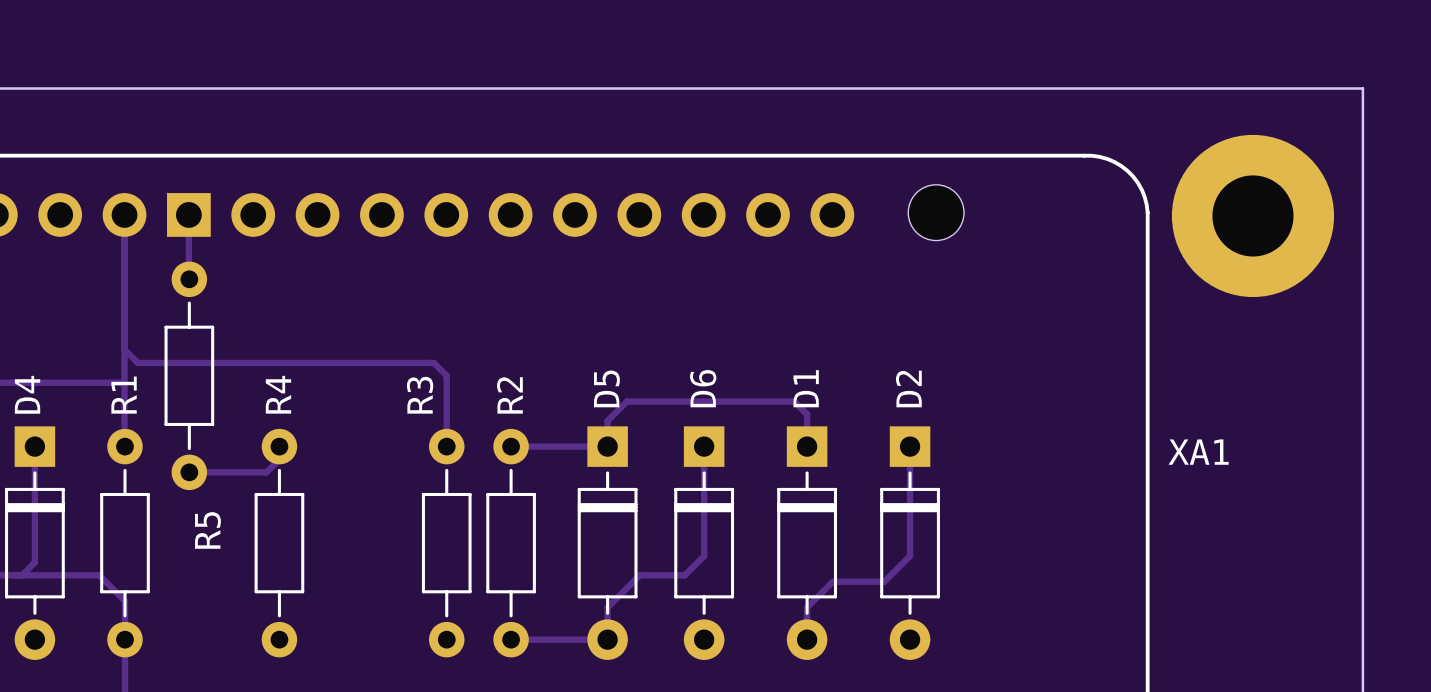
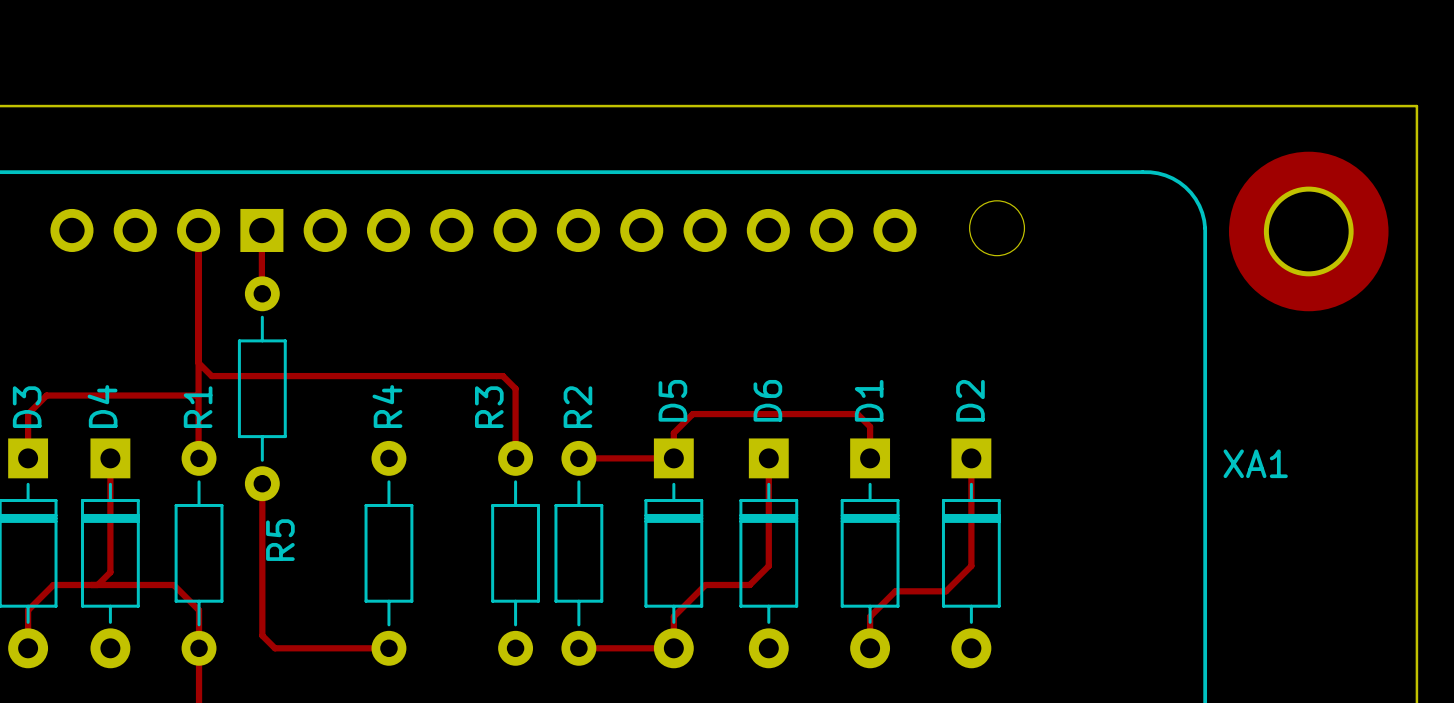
track: (279, 446) (279, 459) (266, 472) (189, 472) -> (388, 648) (275, 648) (262, 635) (262, 483)
R4 position: (279, 543) -> (388, 553)

